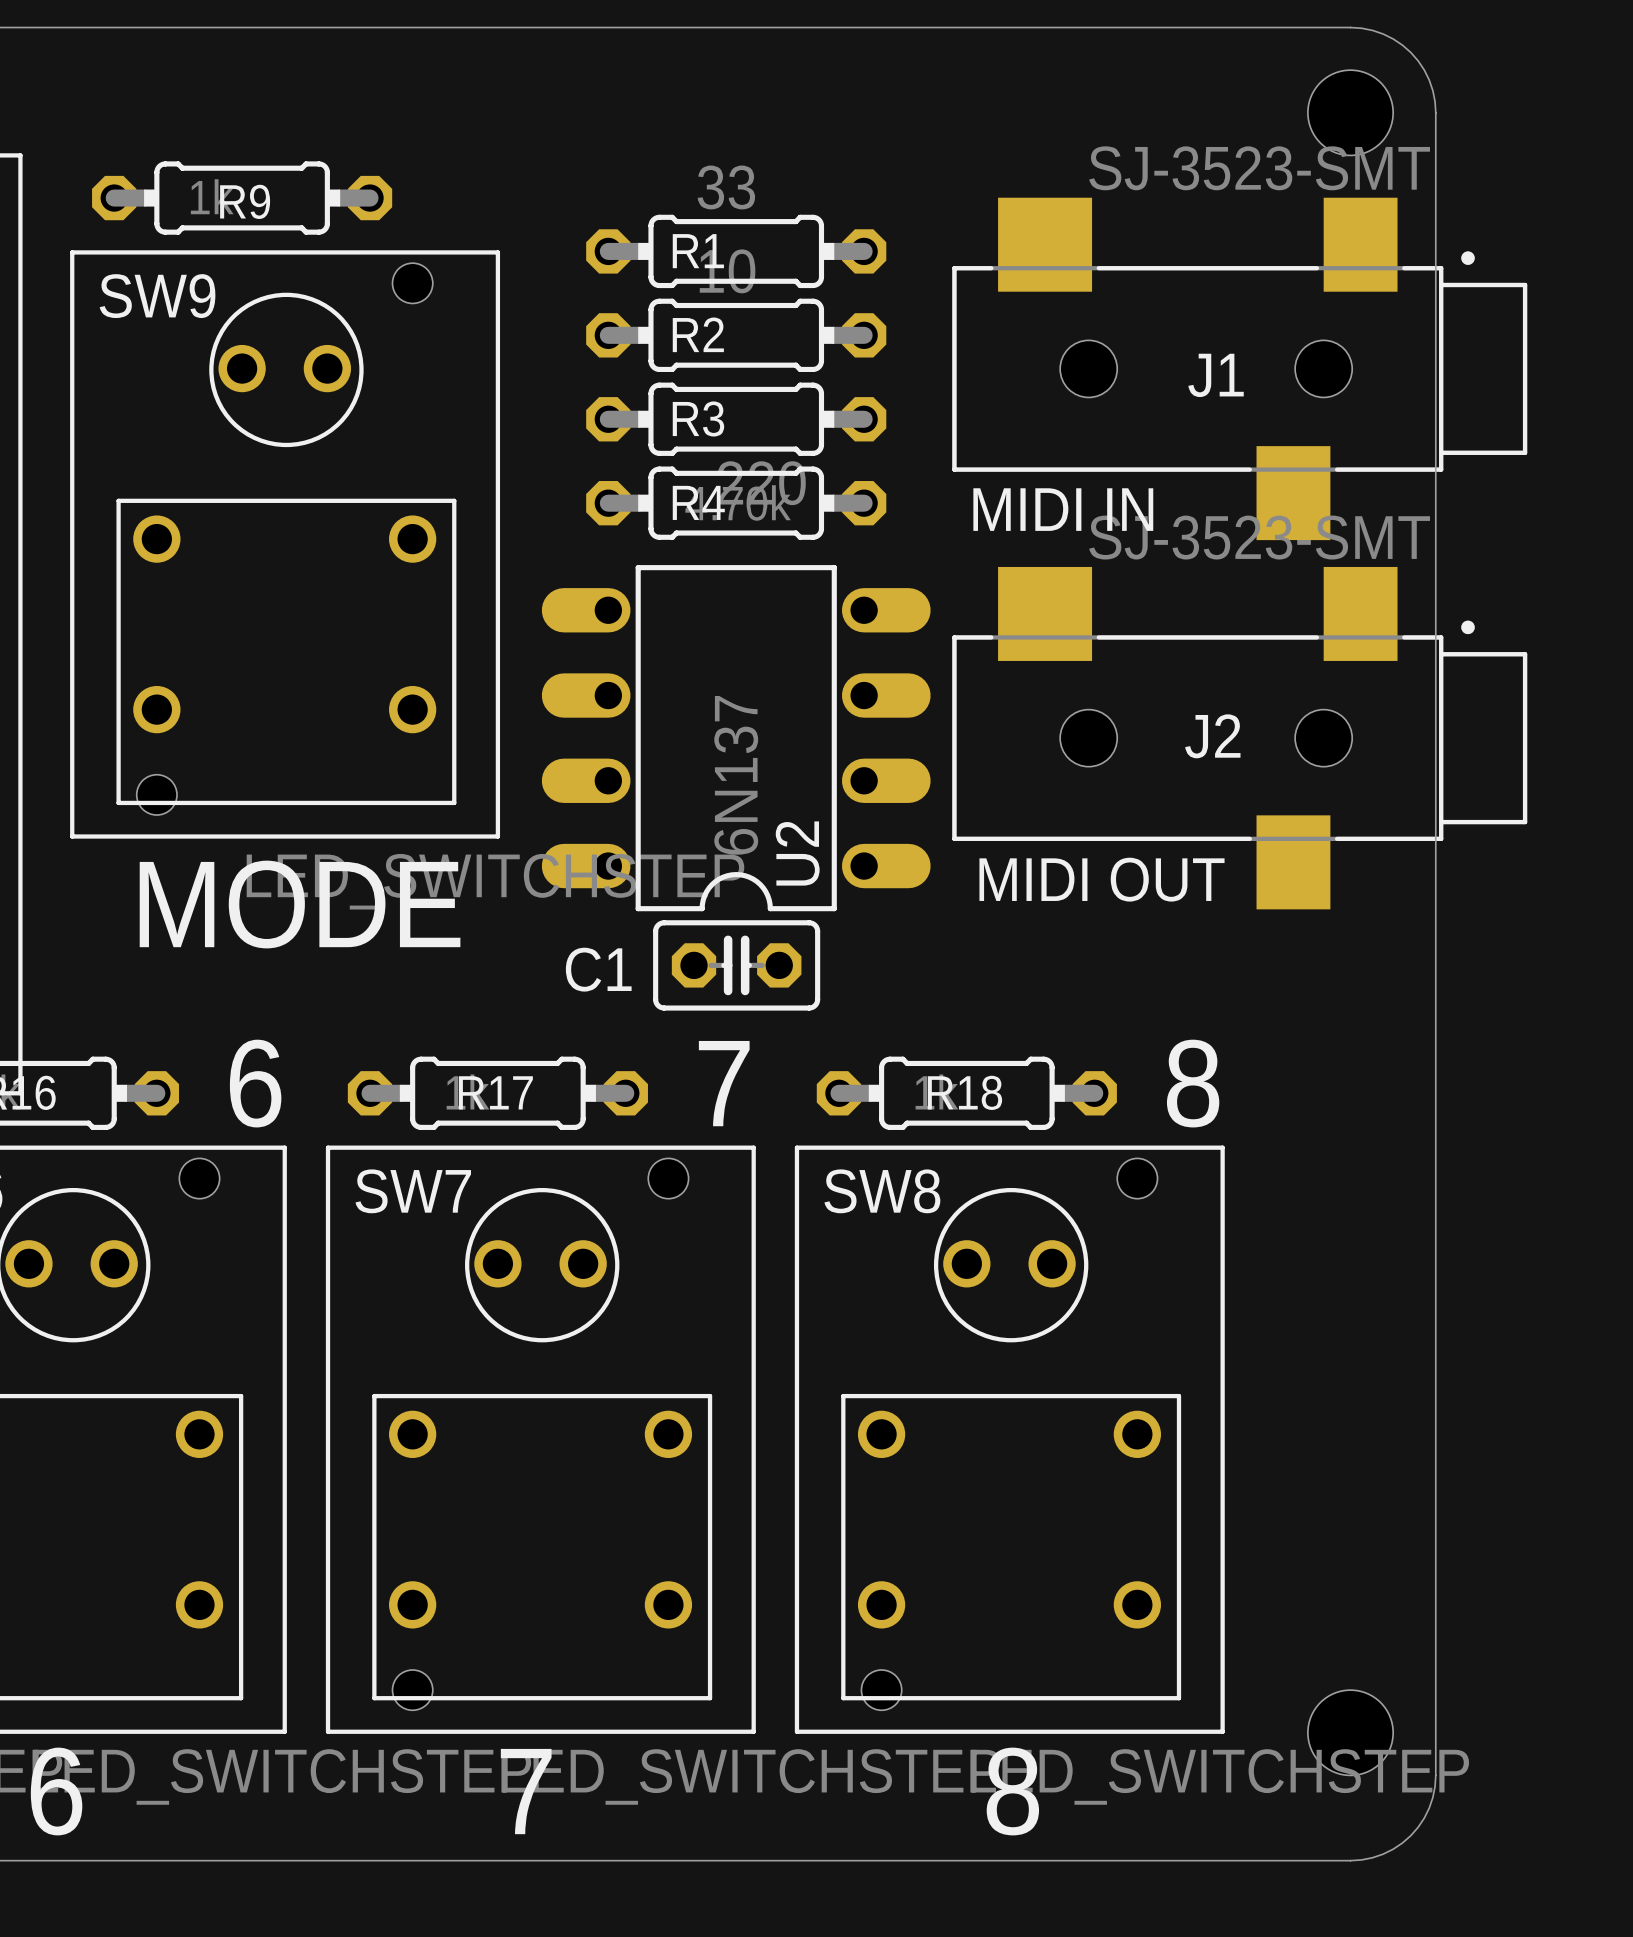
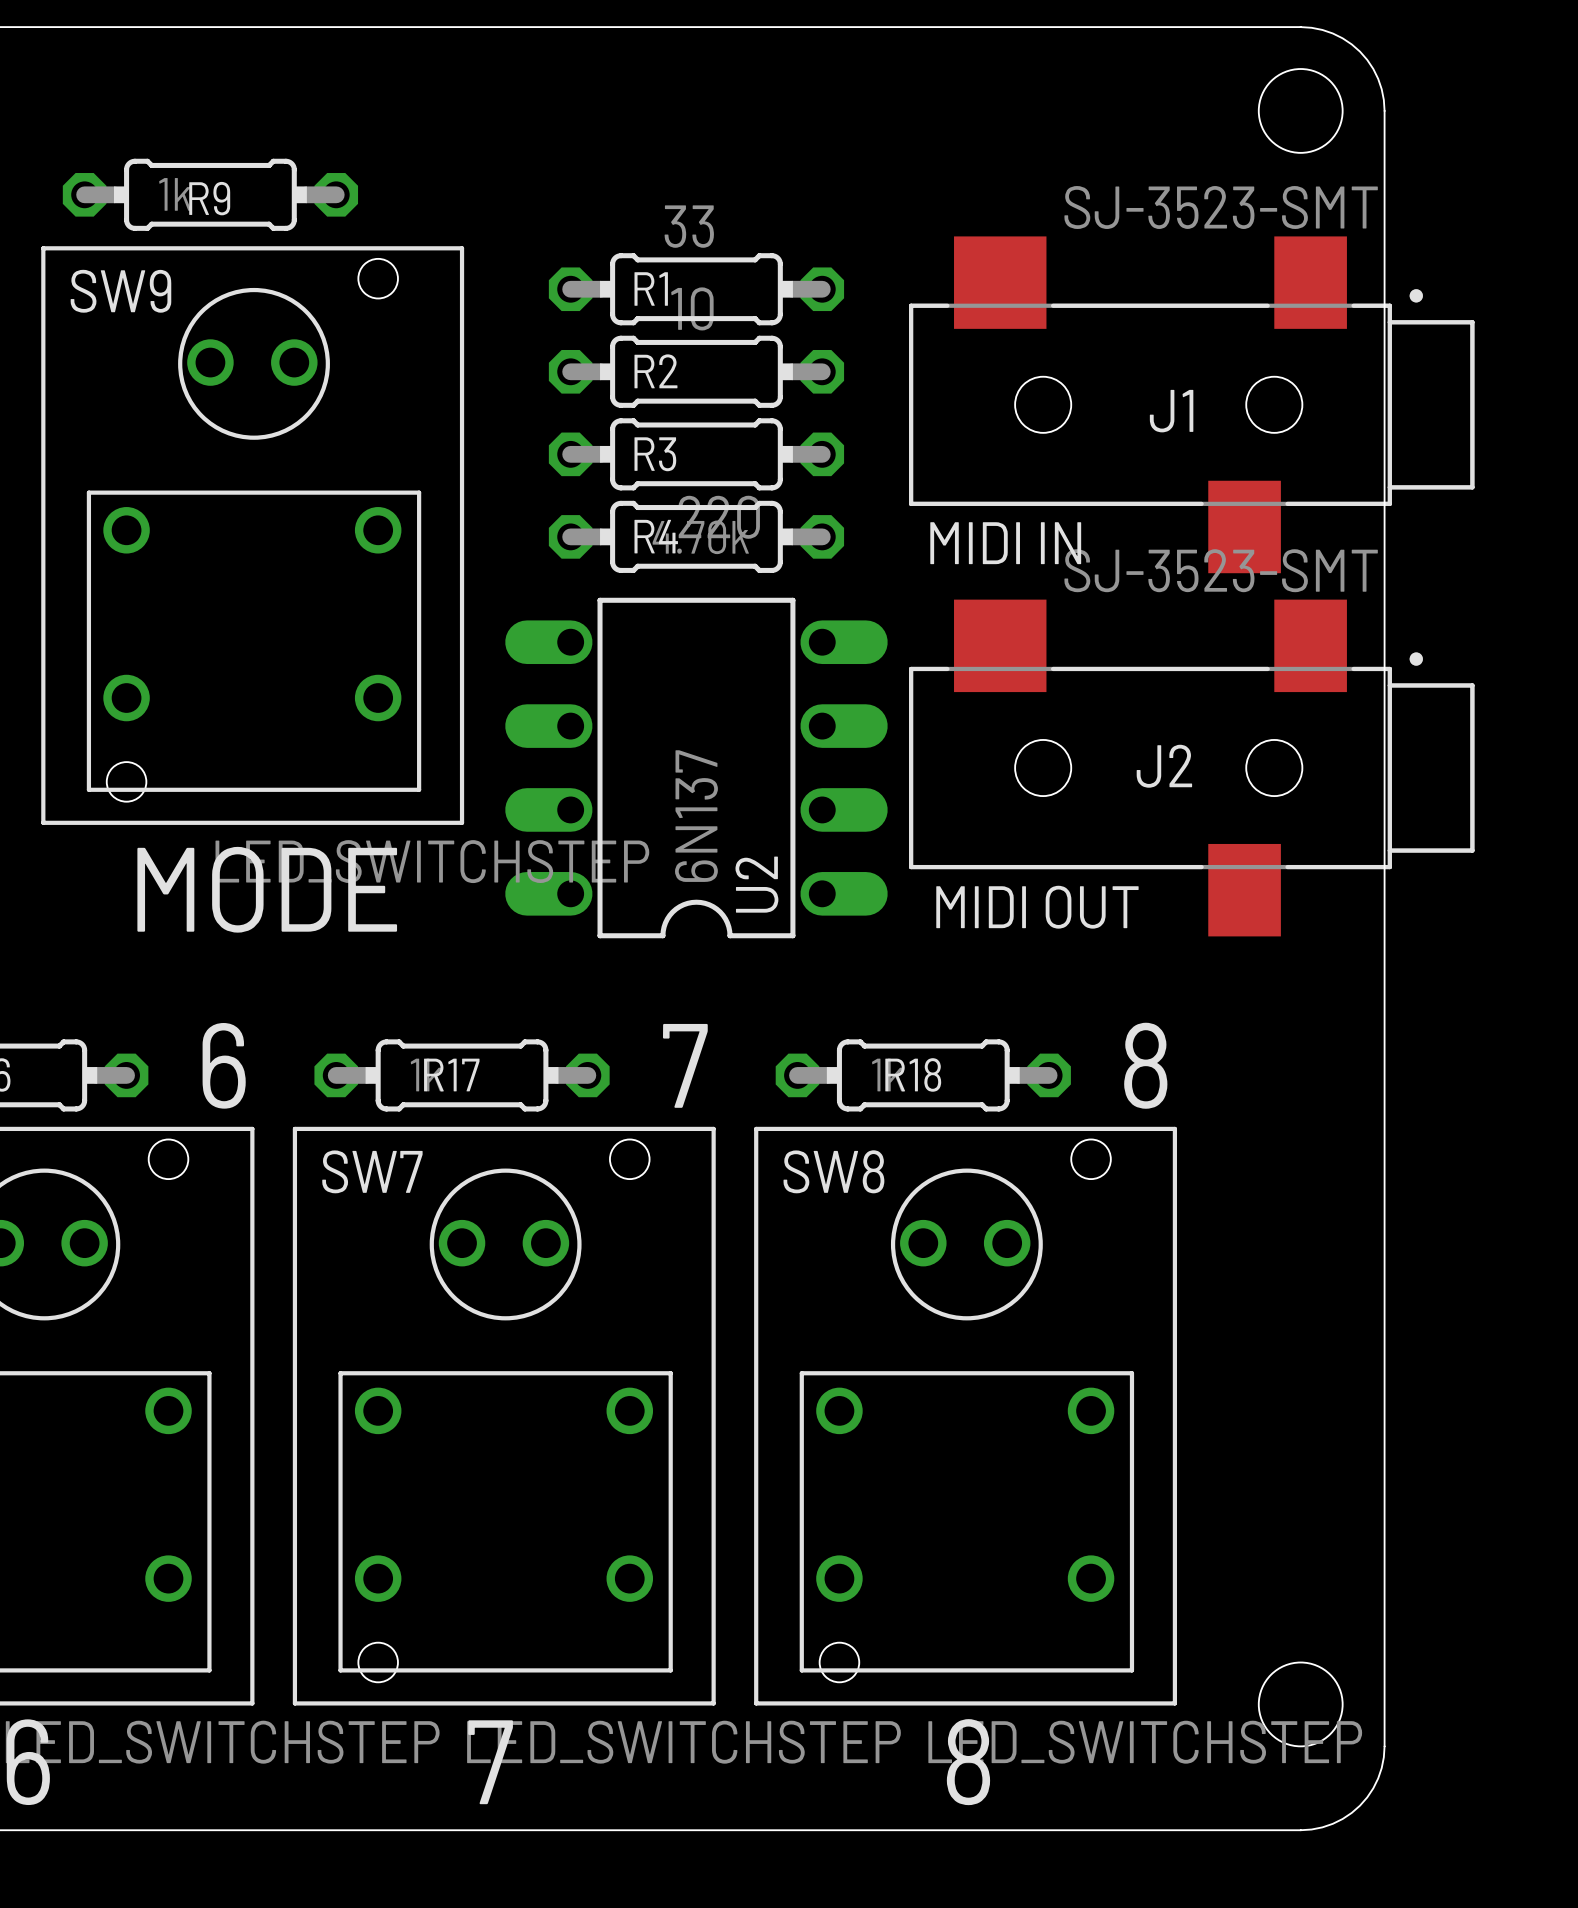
R1 position: (736, 251) -> (696, 289)
R2 position: (736, 335) -> (696, 371)
J1 position: (1239, 368) -> (1191, 404)
R3 position: (736, 419) -> (696, 454)
R4 position: (736, 503) -> (696, 536)
text position: MIDI IN (1063, 509) -> MIDI IN (1005, 543)
U2 position: (736, 738) -> (696, 768)
J2 position: (1239, 738) -> (1191, 768)
text position: MIDI OUT (1102, 879) -> MIDI OUT (1037, 907)
C1: (736, 965) -> none

